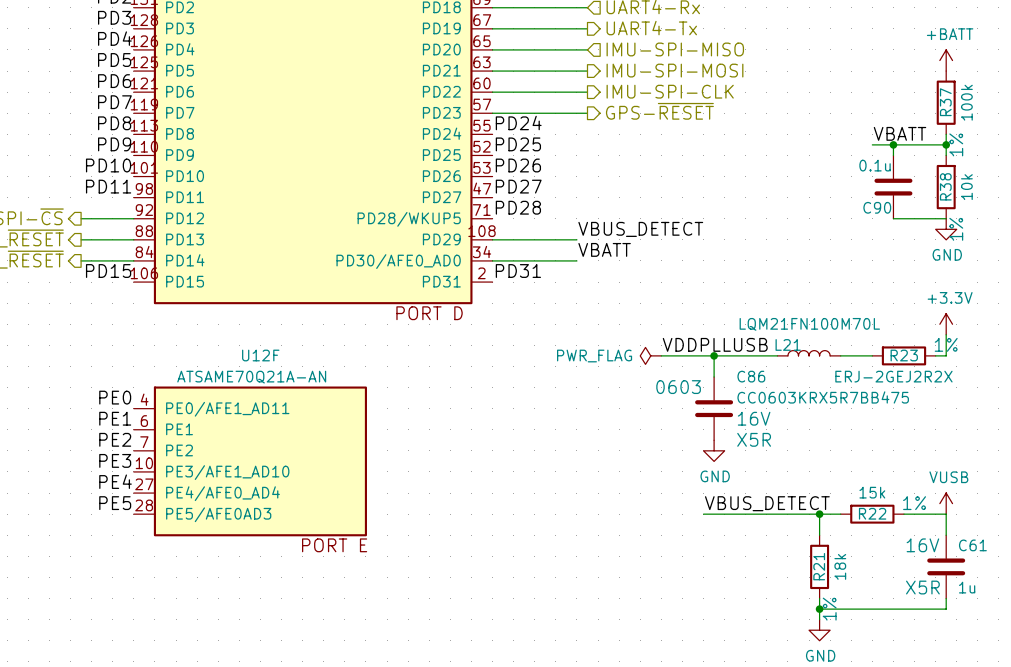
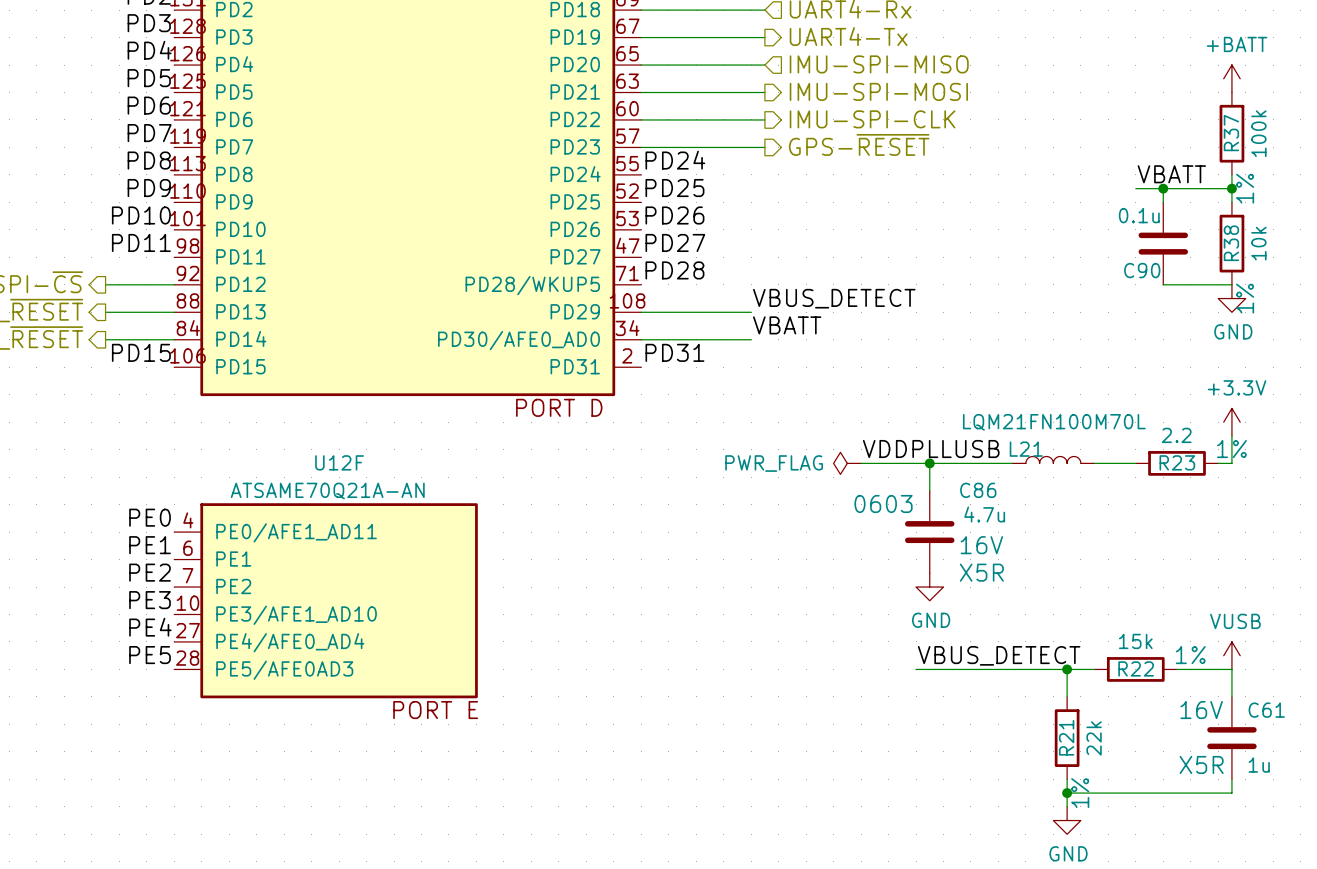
R23 value: ERJ-2GEJ2R2X (893, 376) -> 2.2 (1176, 435)
C86 value: CC0603KRX5R7BB475 (823, 397) -> 4.7u (984, 514)
R21 value: 18k (840, 566) -> 22k (1094, 738)

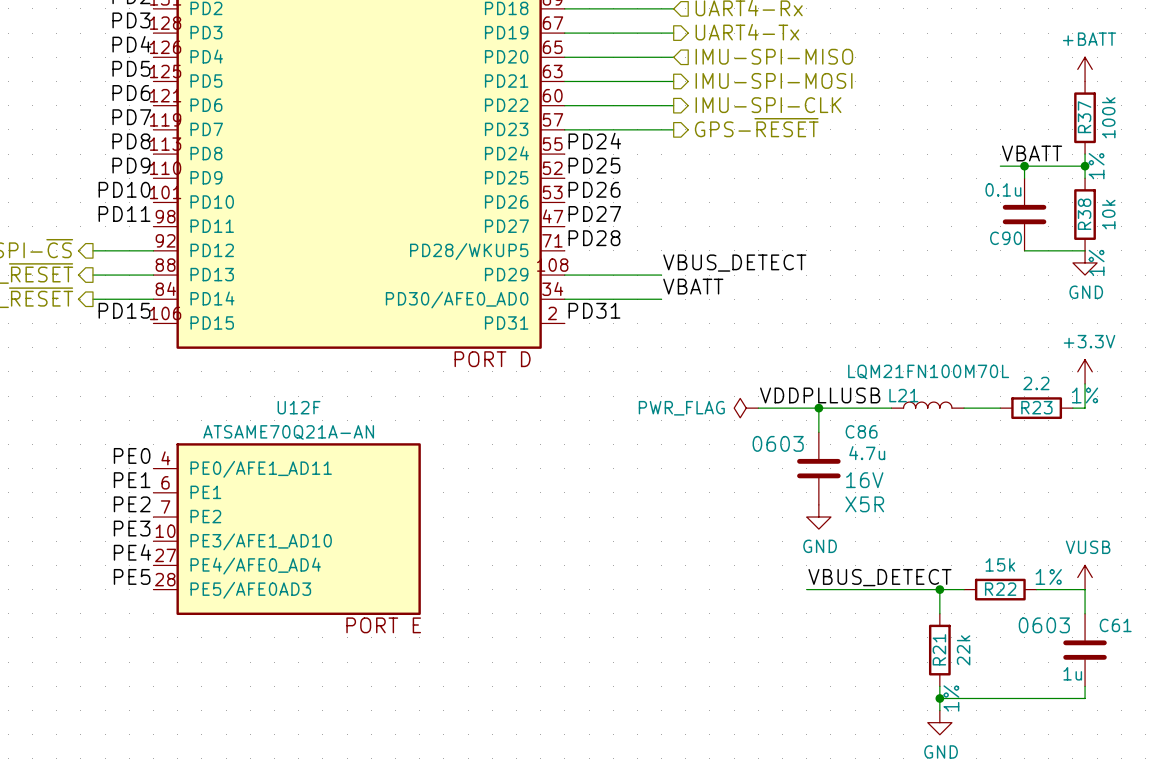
C61 text: none -> 0603 (1044, 625)
C61 text: 16V (1201, 710) -> none
C61 text: X5R (1201, 764) -> none
C61 value position: 1u (1259, 765) -> 1u (1072, 673)

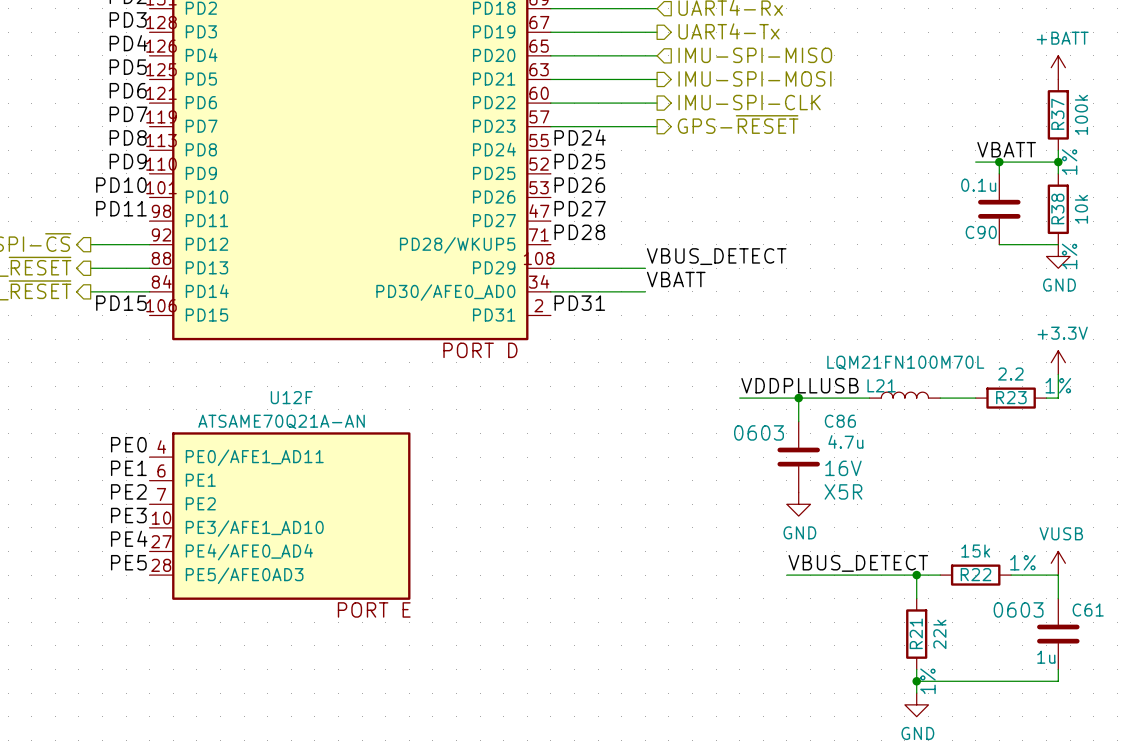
power symbol: PWR_FLAG (746, 408) -> none

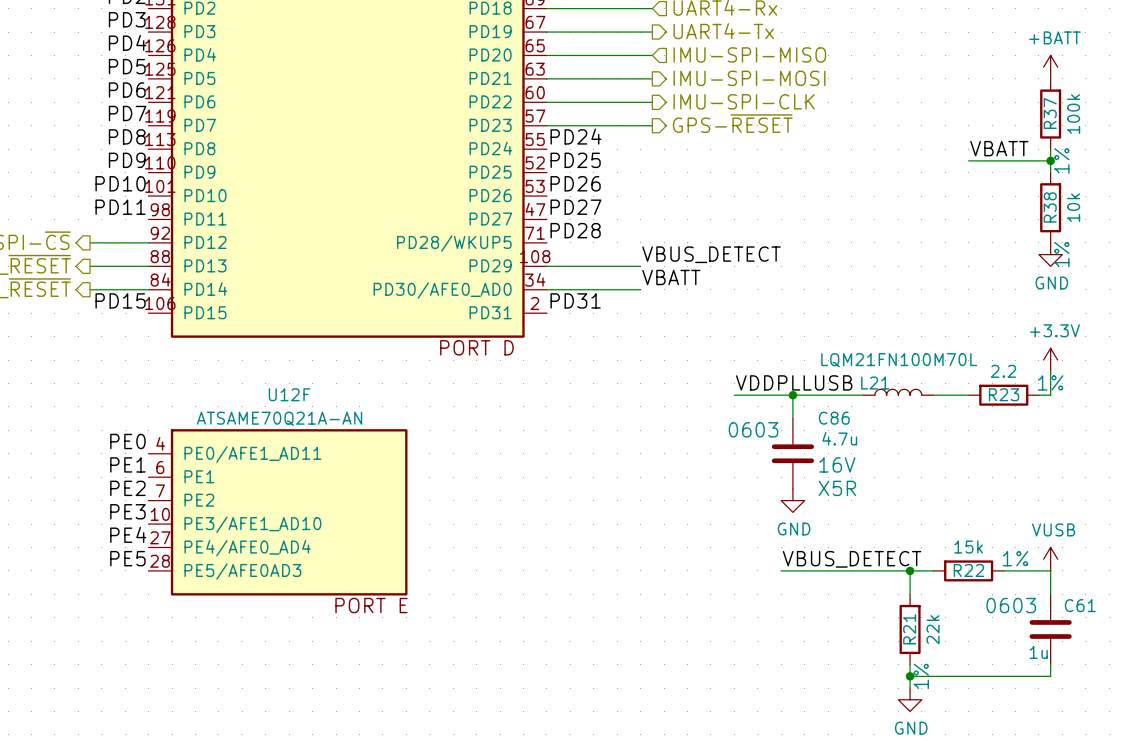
wire: (999, 162) (999, 173) -> none
junction: (999, 162) -> none
C90: 0.1u (999, 209) -> none
wire: (999, 244) (1058, 244) -> none

